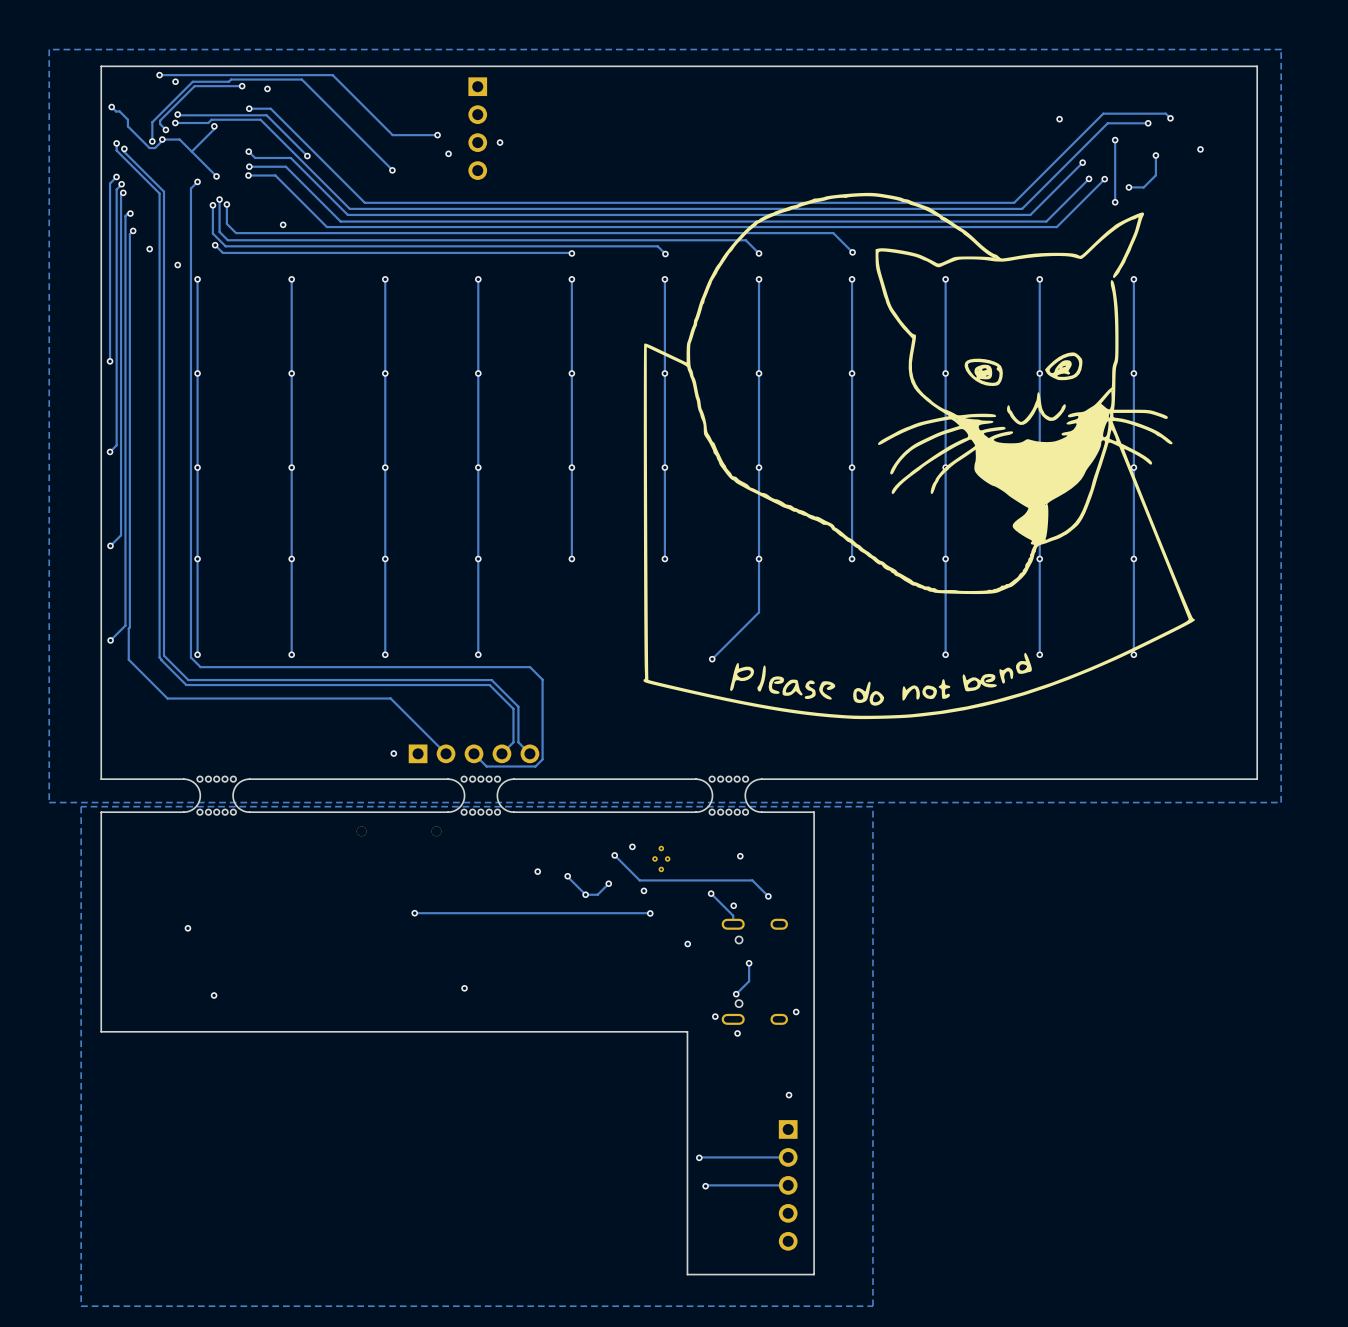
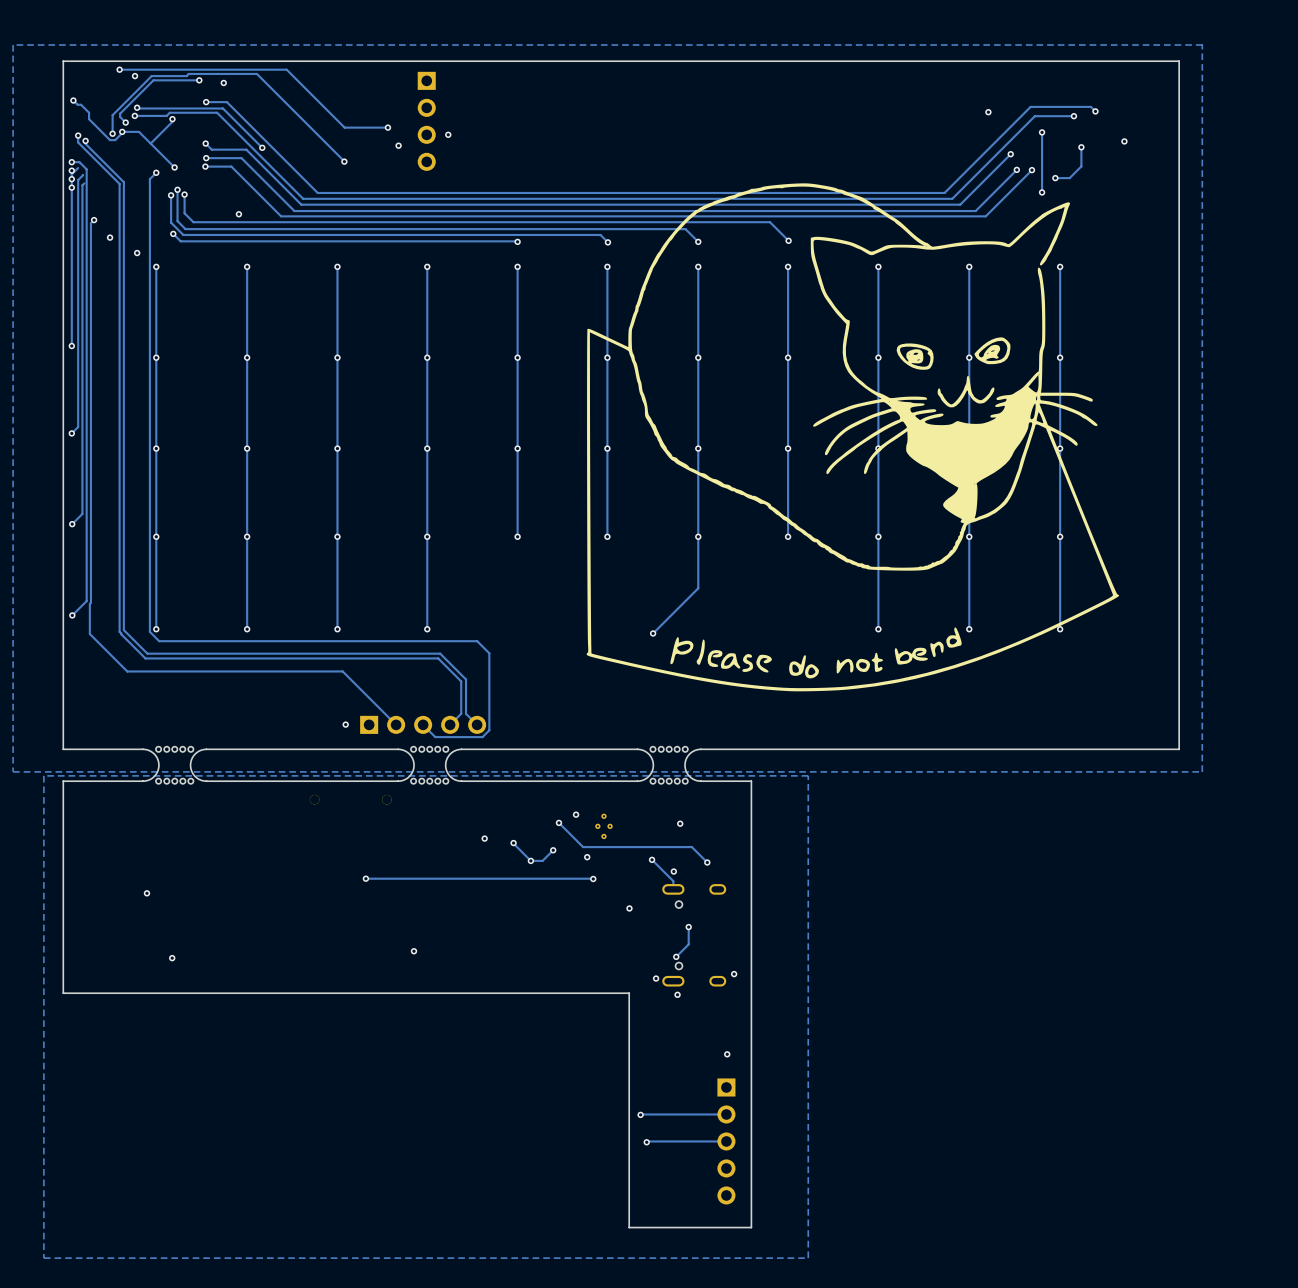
via: none -> (71, 162)
via: (116, 176) -> none
via: none -> (71, 170)
via: (121, 184) -> none
via: none -> (71, 179)
via: (123, 192) -> none
via: none -> (71, 187)
track: (130, 213) (125, 216) -> (71, 162) (79, 162) (86, 169) (86, 205)
via: (130, 213) -> none

